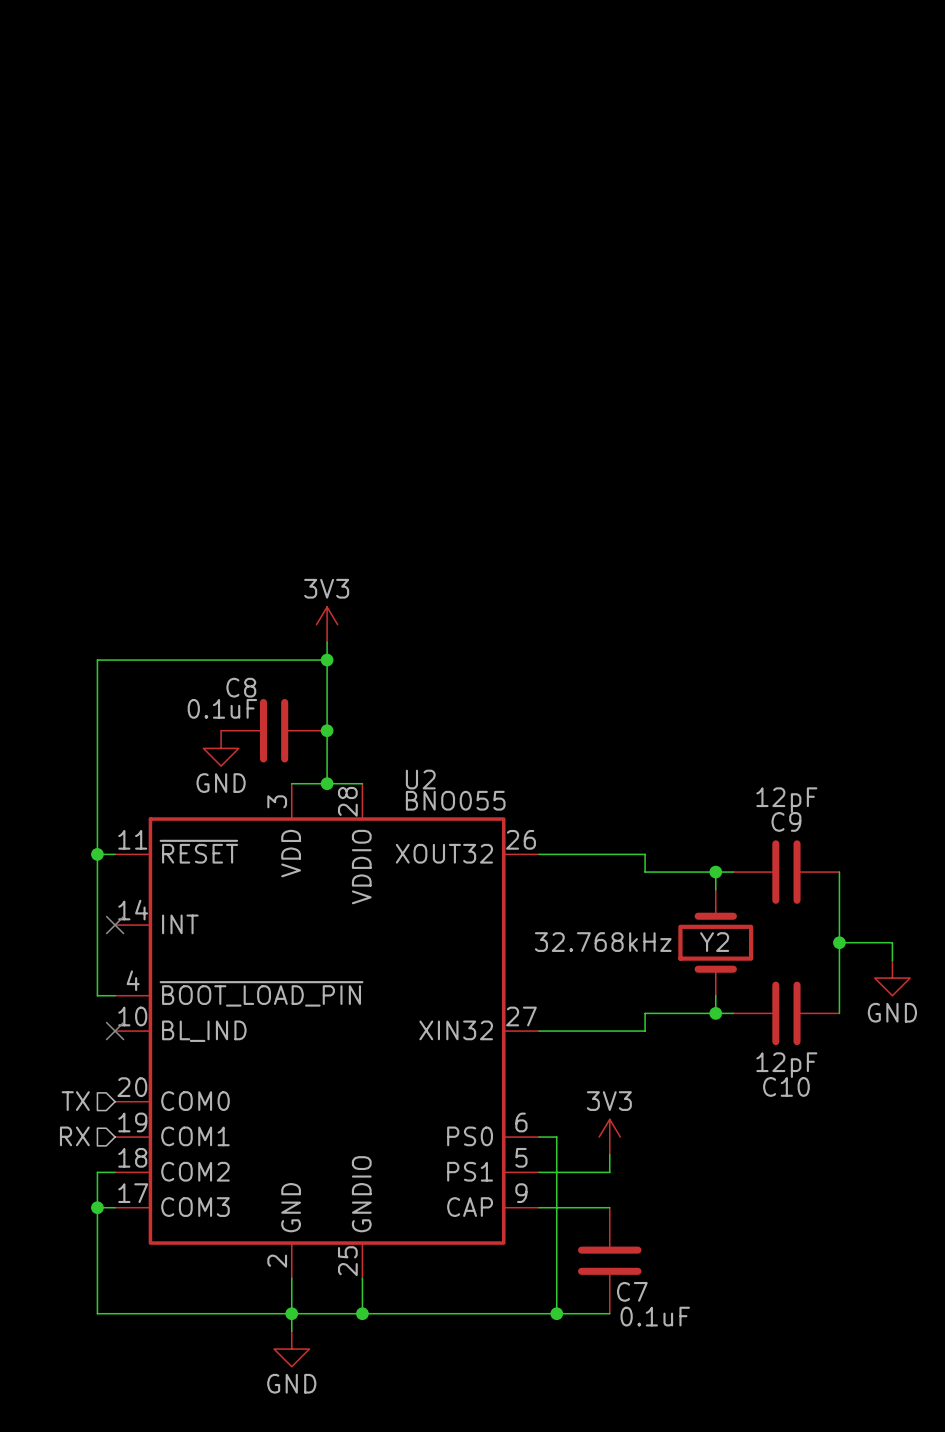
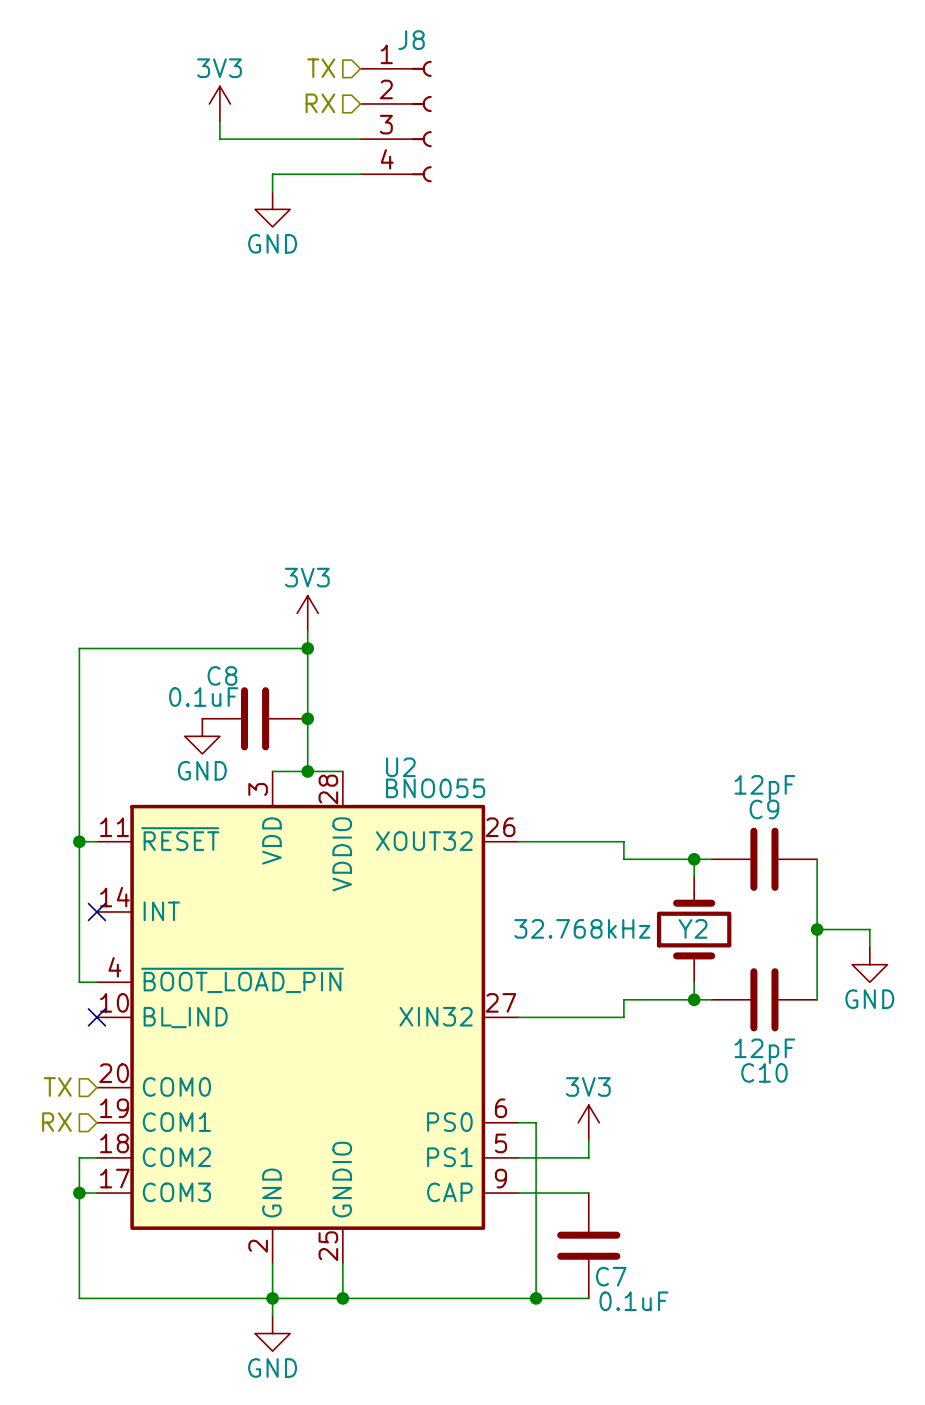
hierarchical label: none -> TX (321, 68)
hierarchical label: none -> RX (320, 103)
power symbol: none -> 3V3 (219, 103)
wire: none -> (219, 121) (219, 139) (360, 139)
J8: none -> (396, 121)
wire: none -> (360, 174) (272, 174) (272, 191)
power symbol: none -> GND (272, 209)

